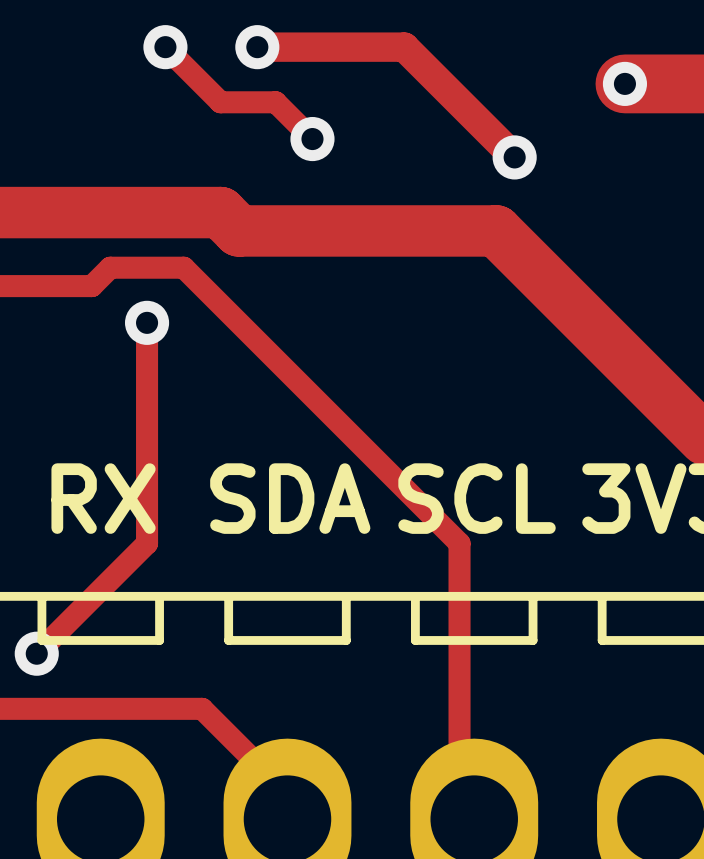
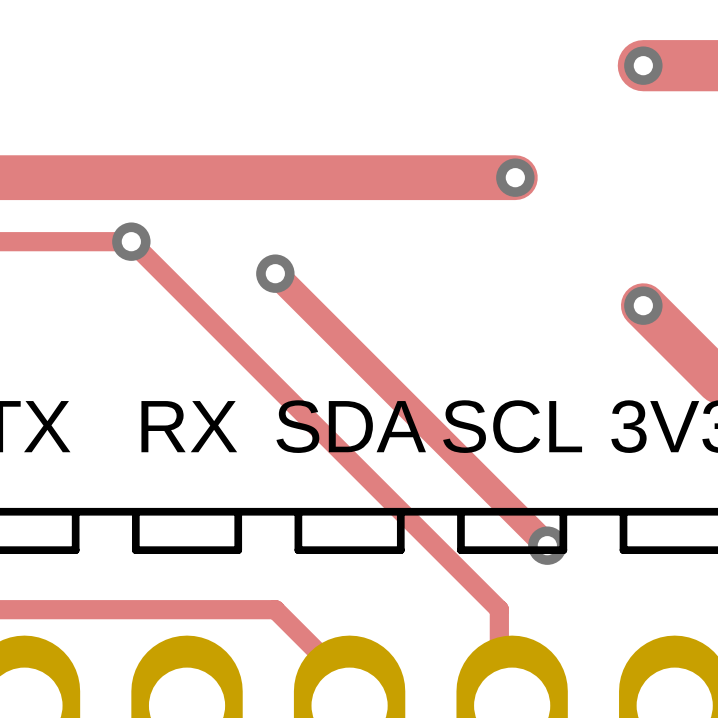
track: (165, 47) (220, 102) (275, 102) (312, 139) -> none
via: (165, 47) -> none
track: (257, 47) (404, 47) (514, 157) -> none
via: (257, 47) -> none
via: (312, 139) -> none
via position: (514, 157) -> (515, 177)
track: (220, 212) (238, 230) (496, 230) (624, 359) -> (291, 177) (515, 177)
track: (36, 286) (91, 286) (110, 267) (183, 267) (459, 543) (459, 708) -> (131, 241) (499, 609)
via: none -> (131, 241)
track: (147, 322) (147, 543) (36, 653) -> none
via position: (147, 322) -> (275, 273)
track: none -> (275, 273) (547, 545)
via: none -> (643, 305)
via: none -> (547, 545)
via: (36, 653) -> none

